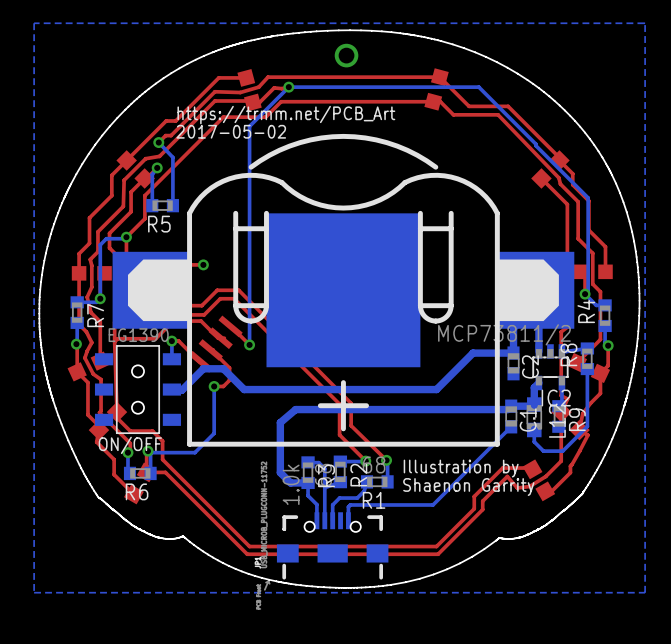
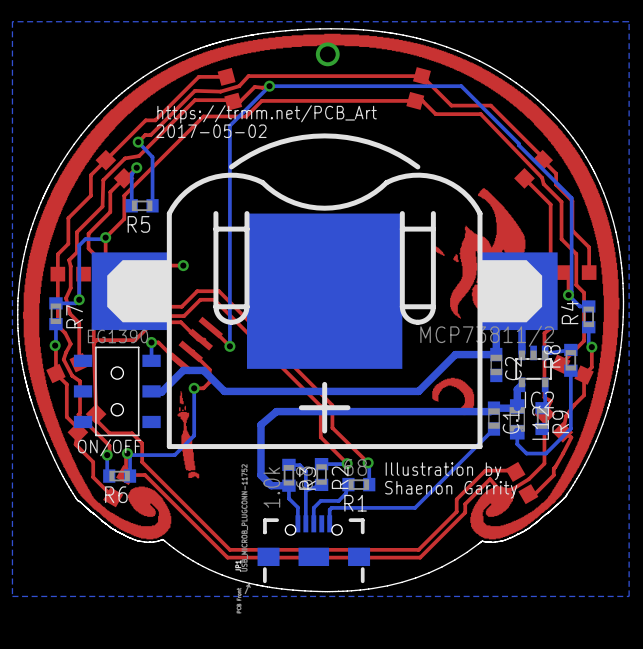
drawing: none -> [22, 33, 620, 540]
drawing: none -> [431, 188, 526, 319]
drawing: none -> [432, 377, 475, 416]
drawing: none -> [177, 391, 200, 479]

